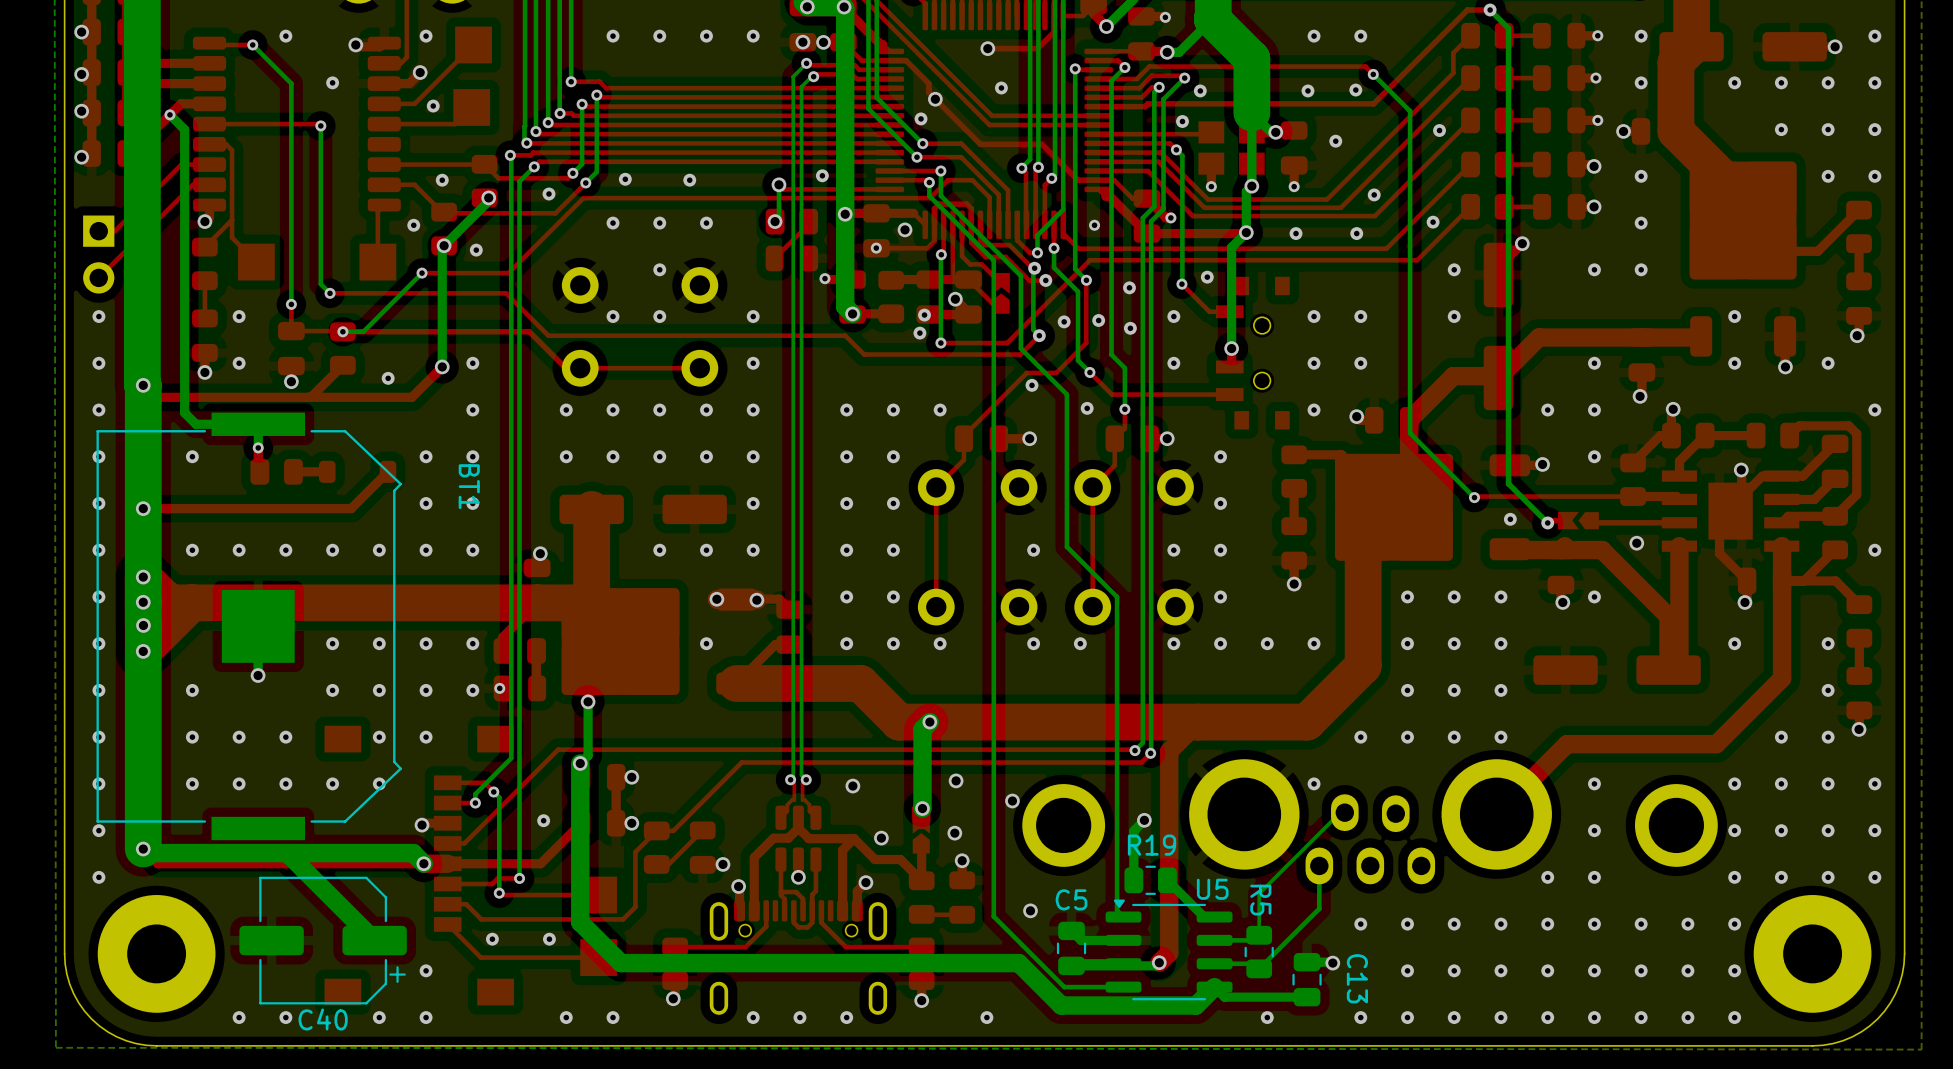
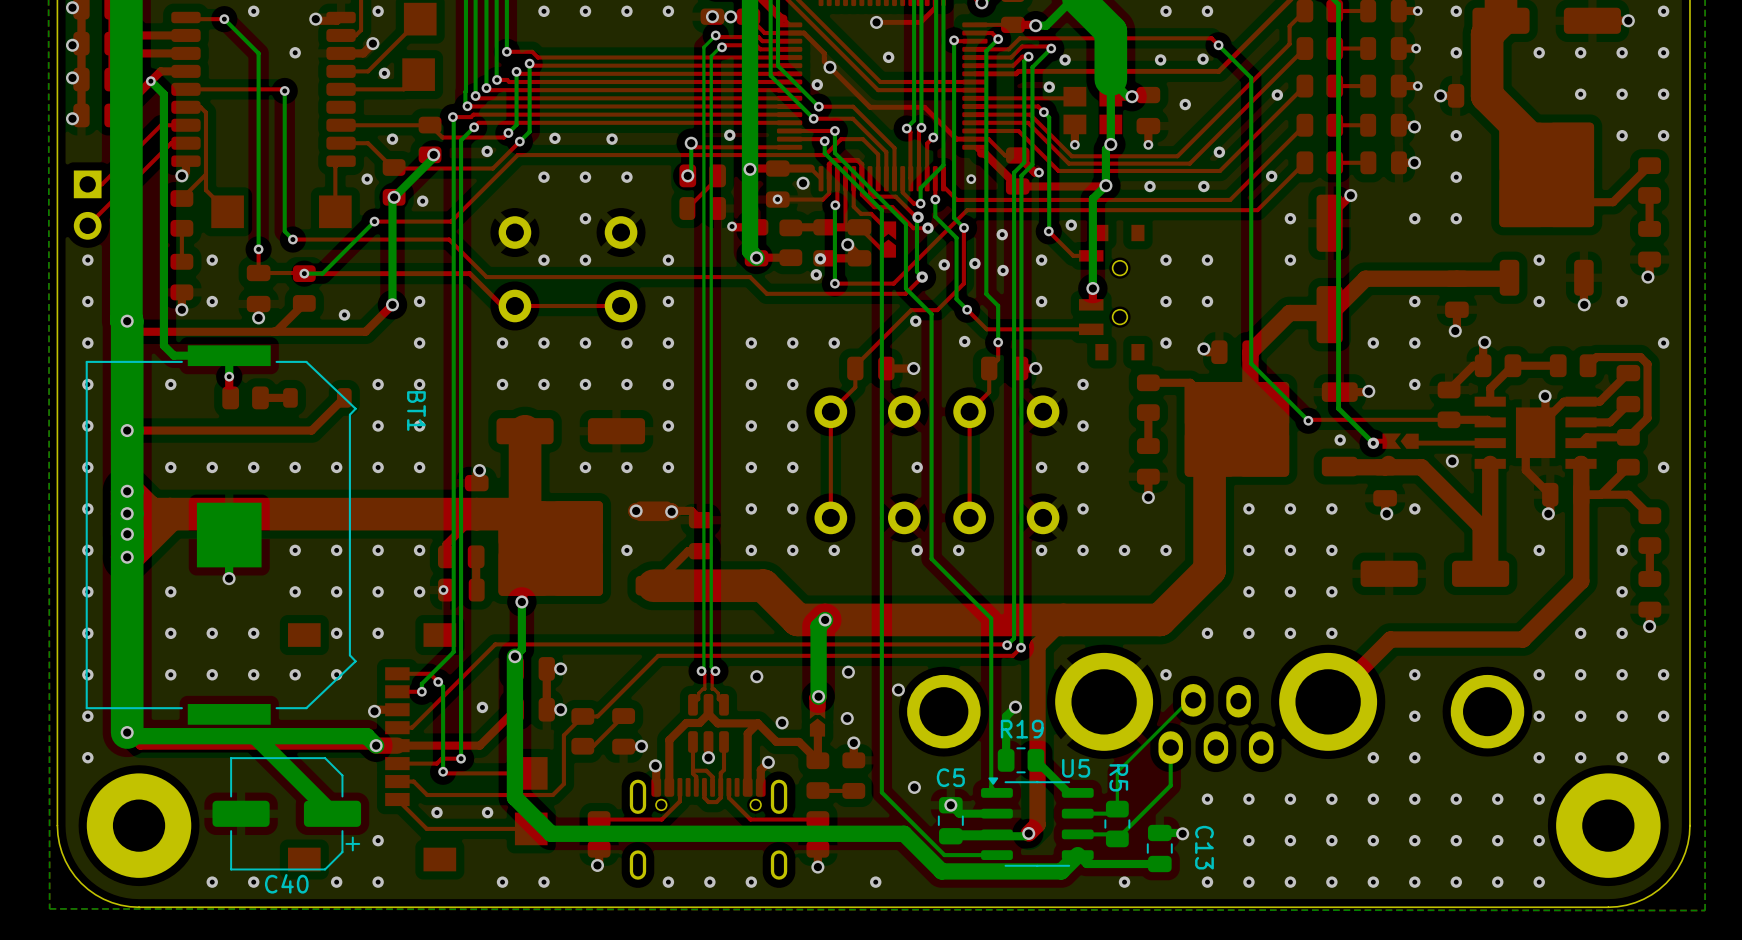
bottom track: (1049, 377) (1066, 394) (1066, 546) (1117, 596) (1117, 720) -> (931, 314) (931, 558) (991, 618)
via: none -> (950, 805)

